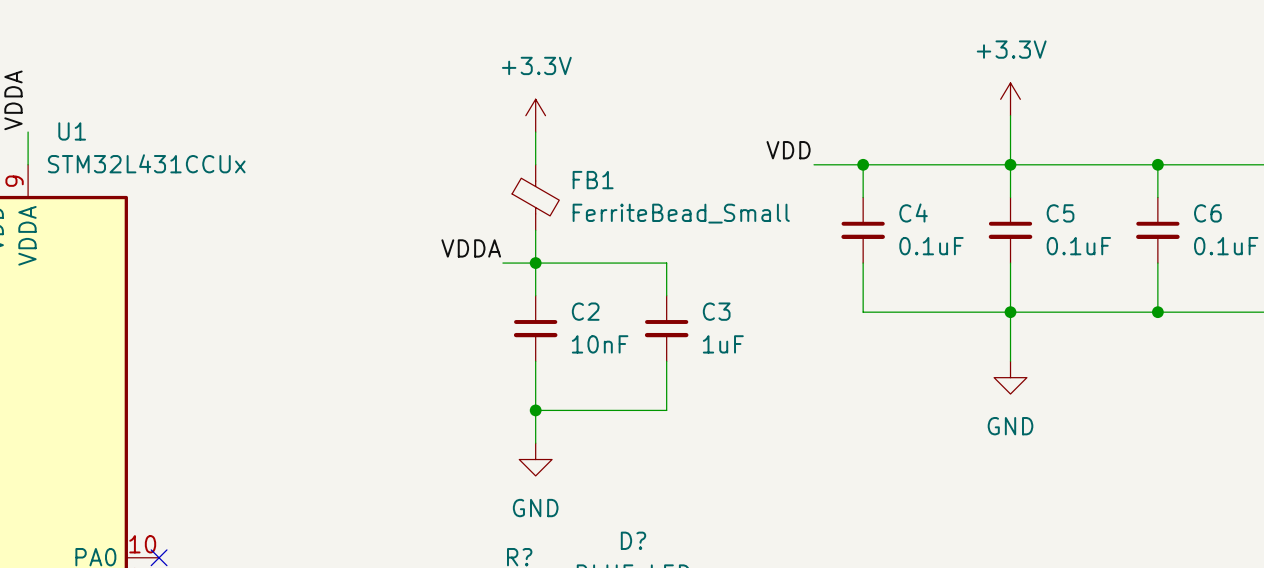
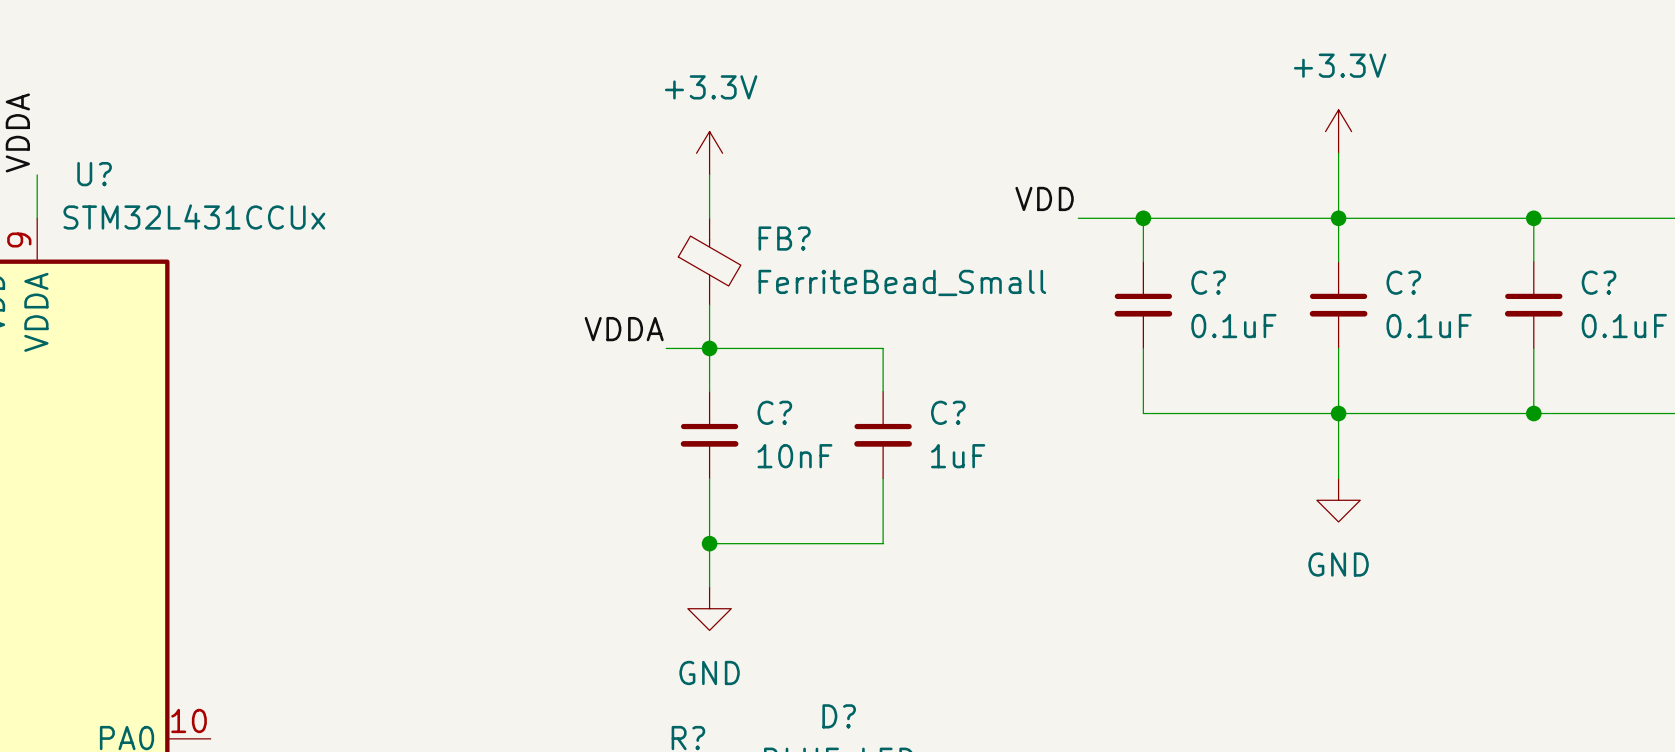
U1 name: U1 (72, 131) -> U? (94, 174)
FB1 name: FB1 (593, 180) -> FB? (784, 238)
C4 name: C4 (913, 213) -> C? (1208, 282)
C5 name: C5 (1060, 213) -> C? (1403, 282)
C6 name: C6 (1207, 213) -> C? (1599, 282)
C2 name: C2 (585, 311) -> C? (774, 412)
C3 name: C3 (716, 311) -> C? (948, 412)
no-connect mark: (159, 557) -> none

